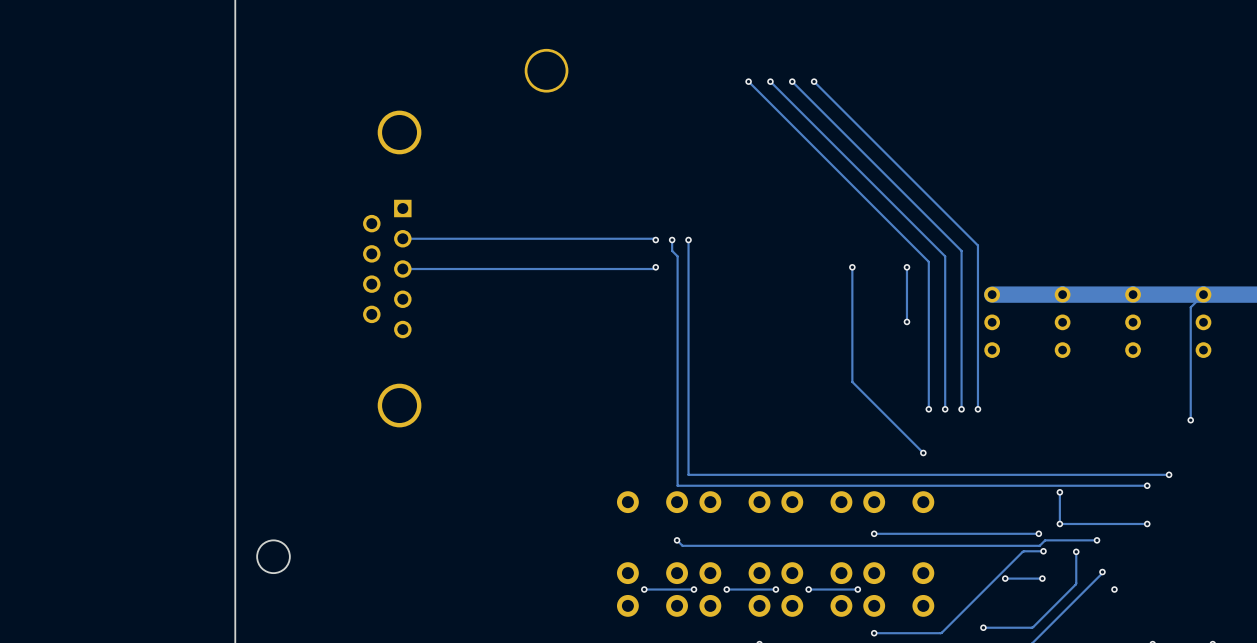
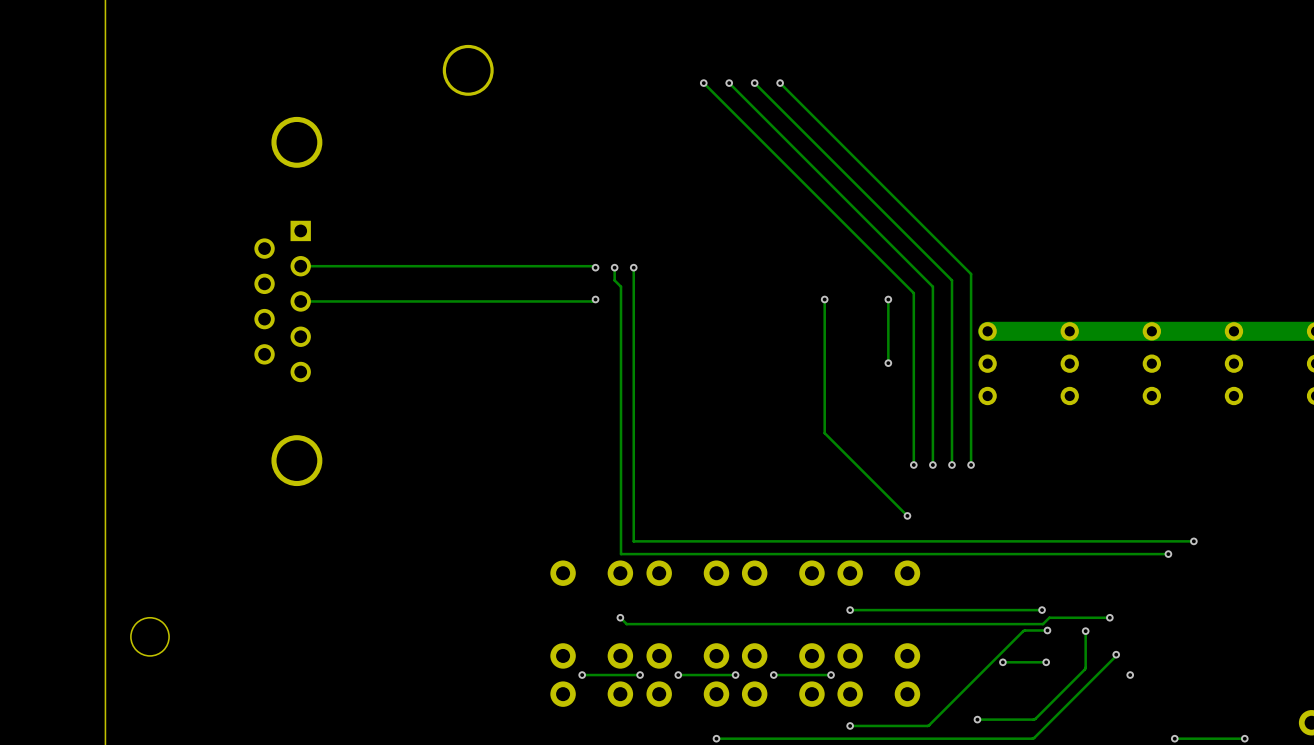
track: (1203, 294) (1190, 307) (1190, 420) -> none
via: (1190, 420) -> none
track: (1059, 492) (1059, 523) (1147, 523) -> none
via: (1059, 492) -> none
via: (1059, 523) -> none
via: (1147, 523) -> none

